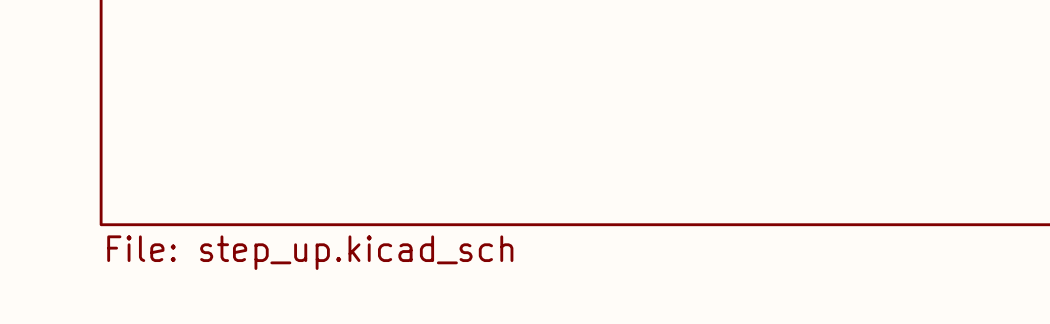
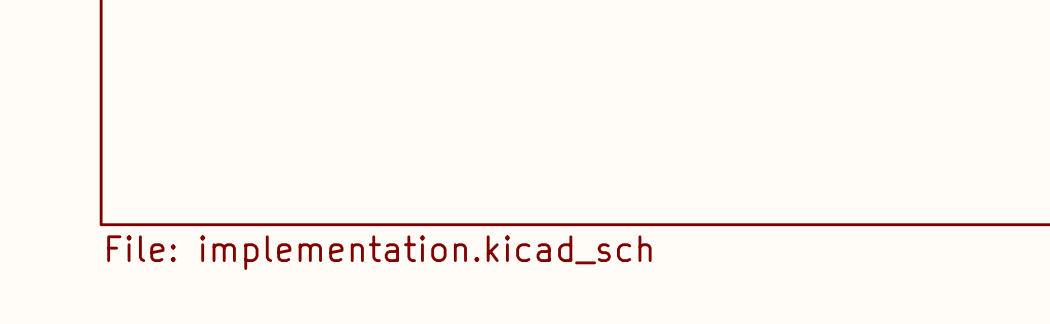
sheet value: File: step_up.kicad_sch (310, 252) -> File: implementation.kicad_sch (379, 252)

